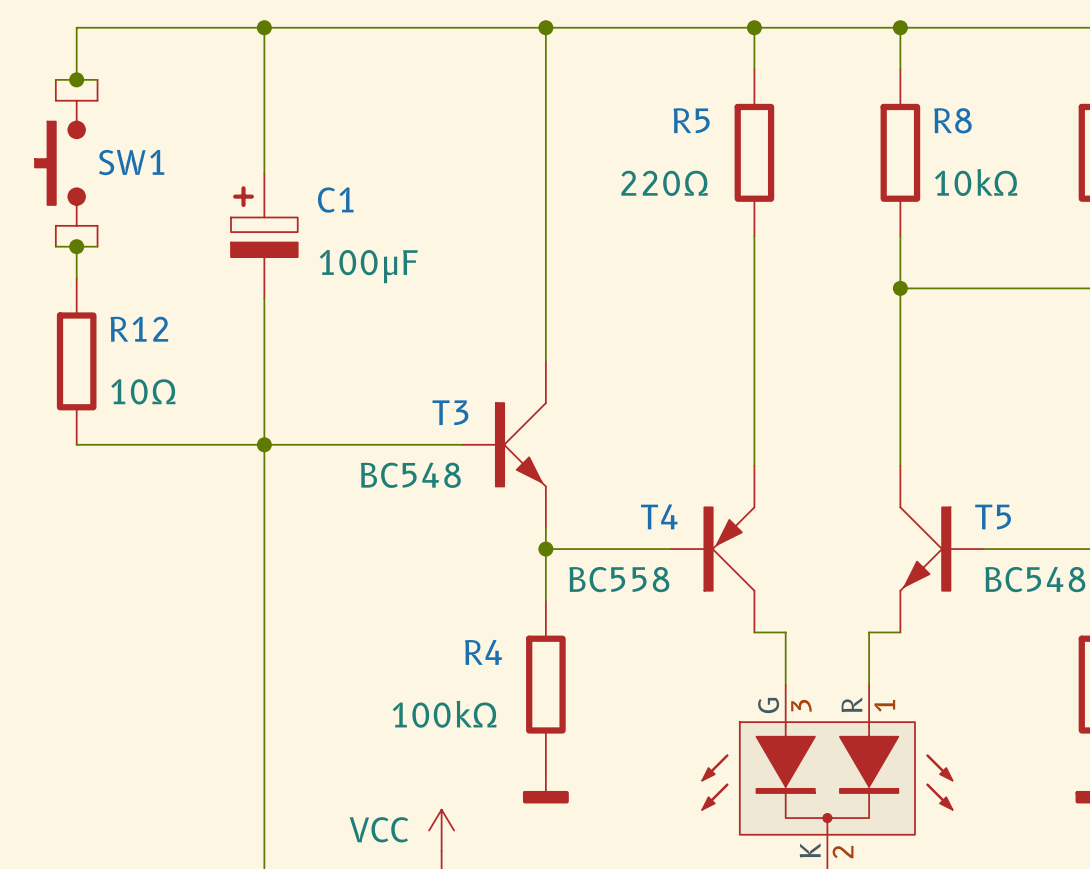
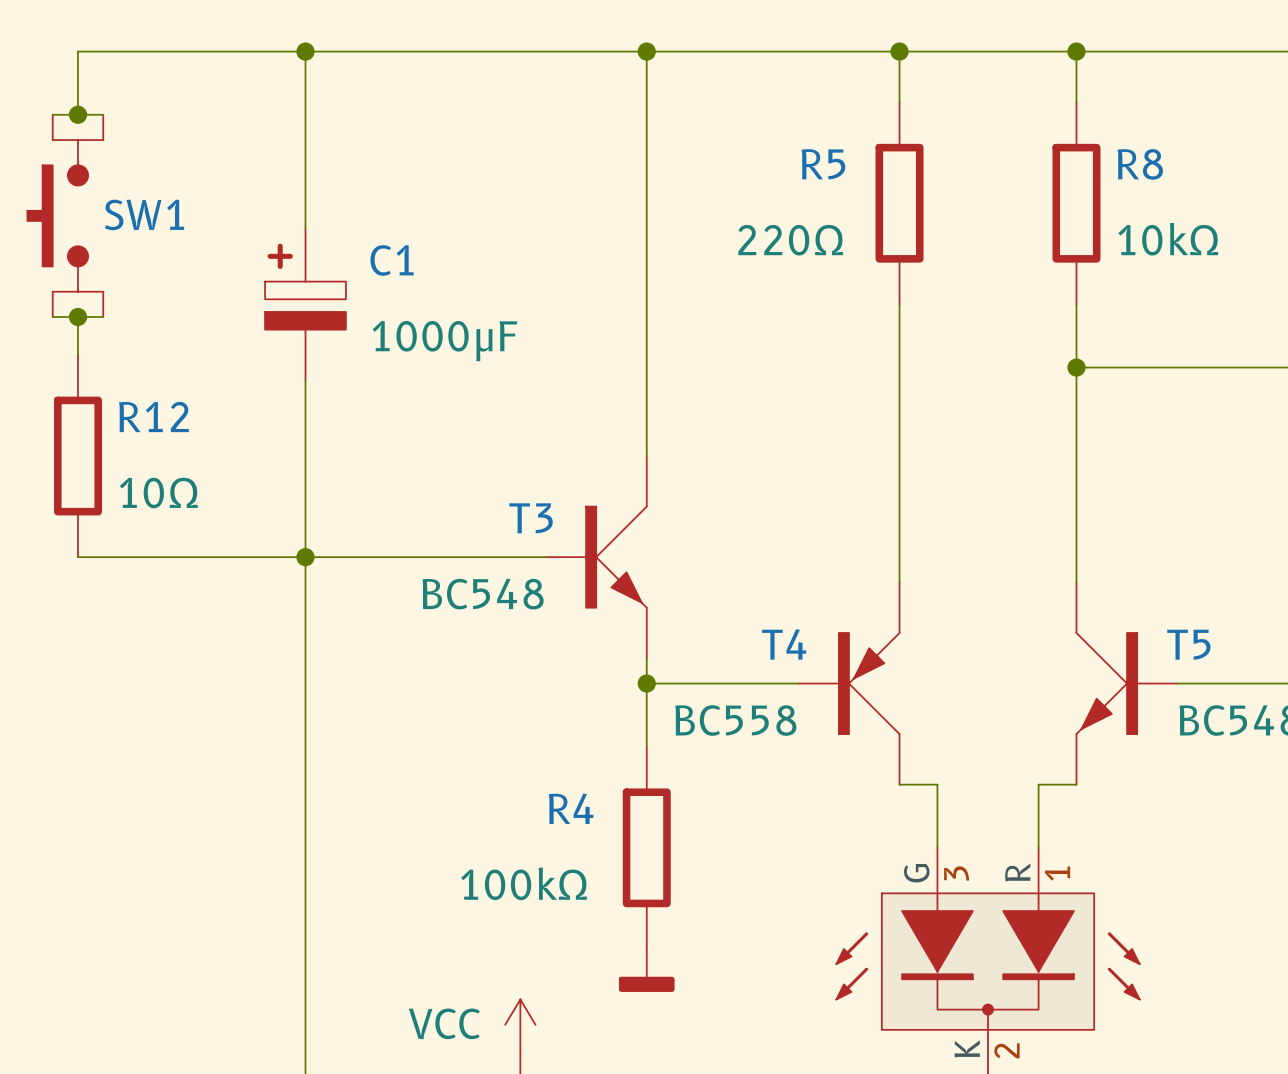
C1 value: 100μF (368, 266) -> 1000μF (444, 341)

